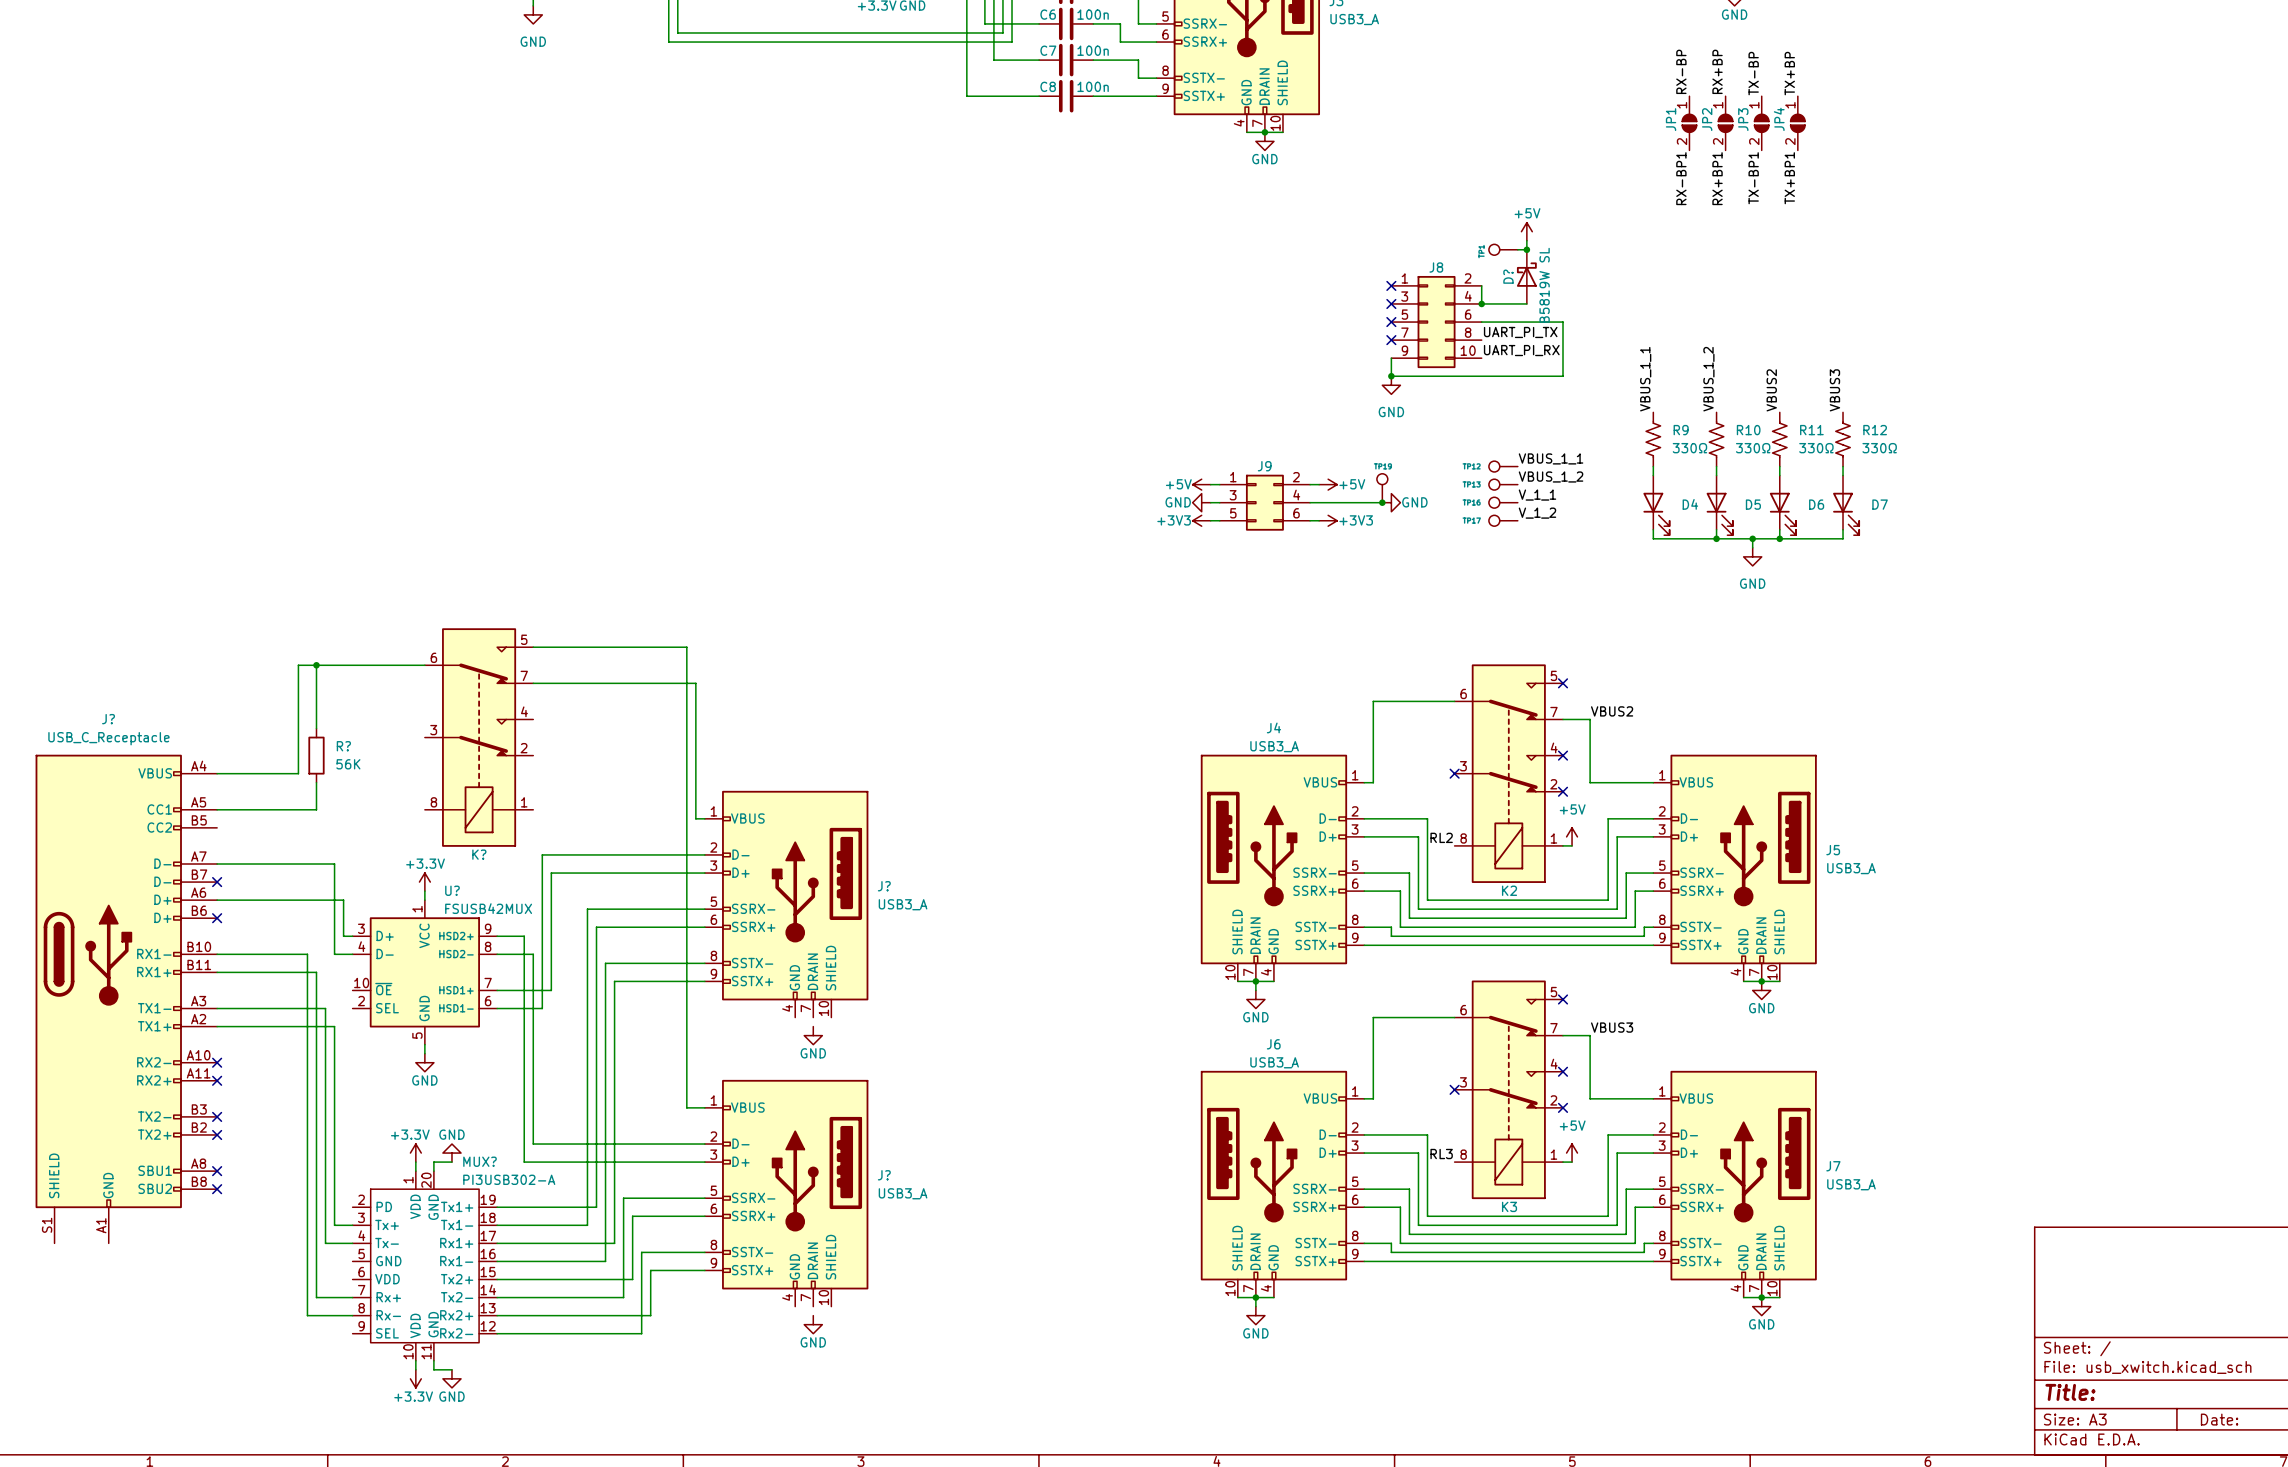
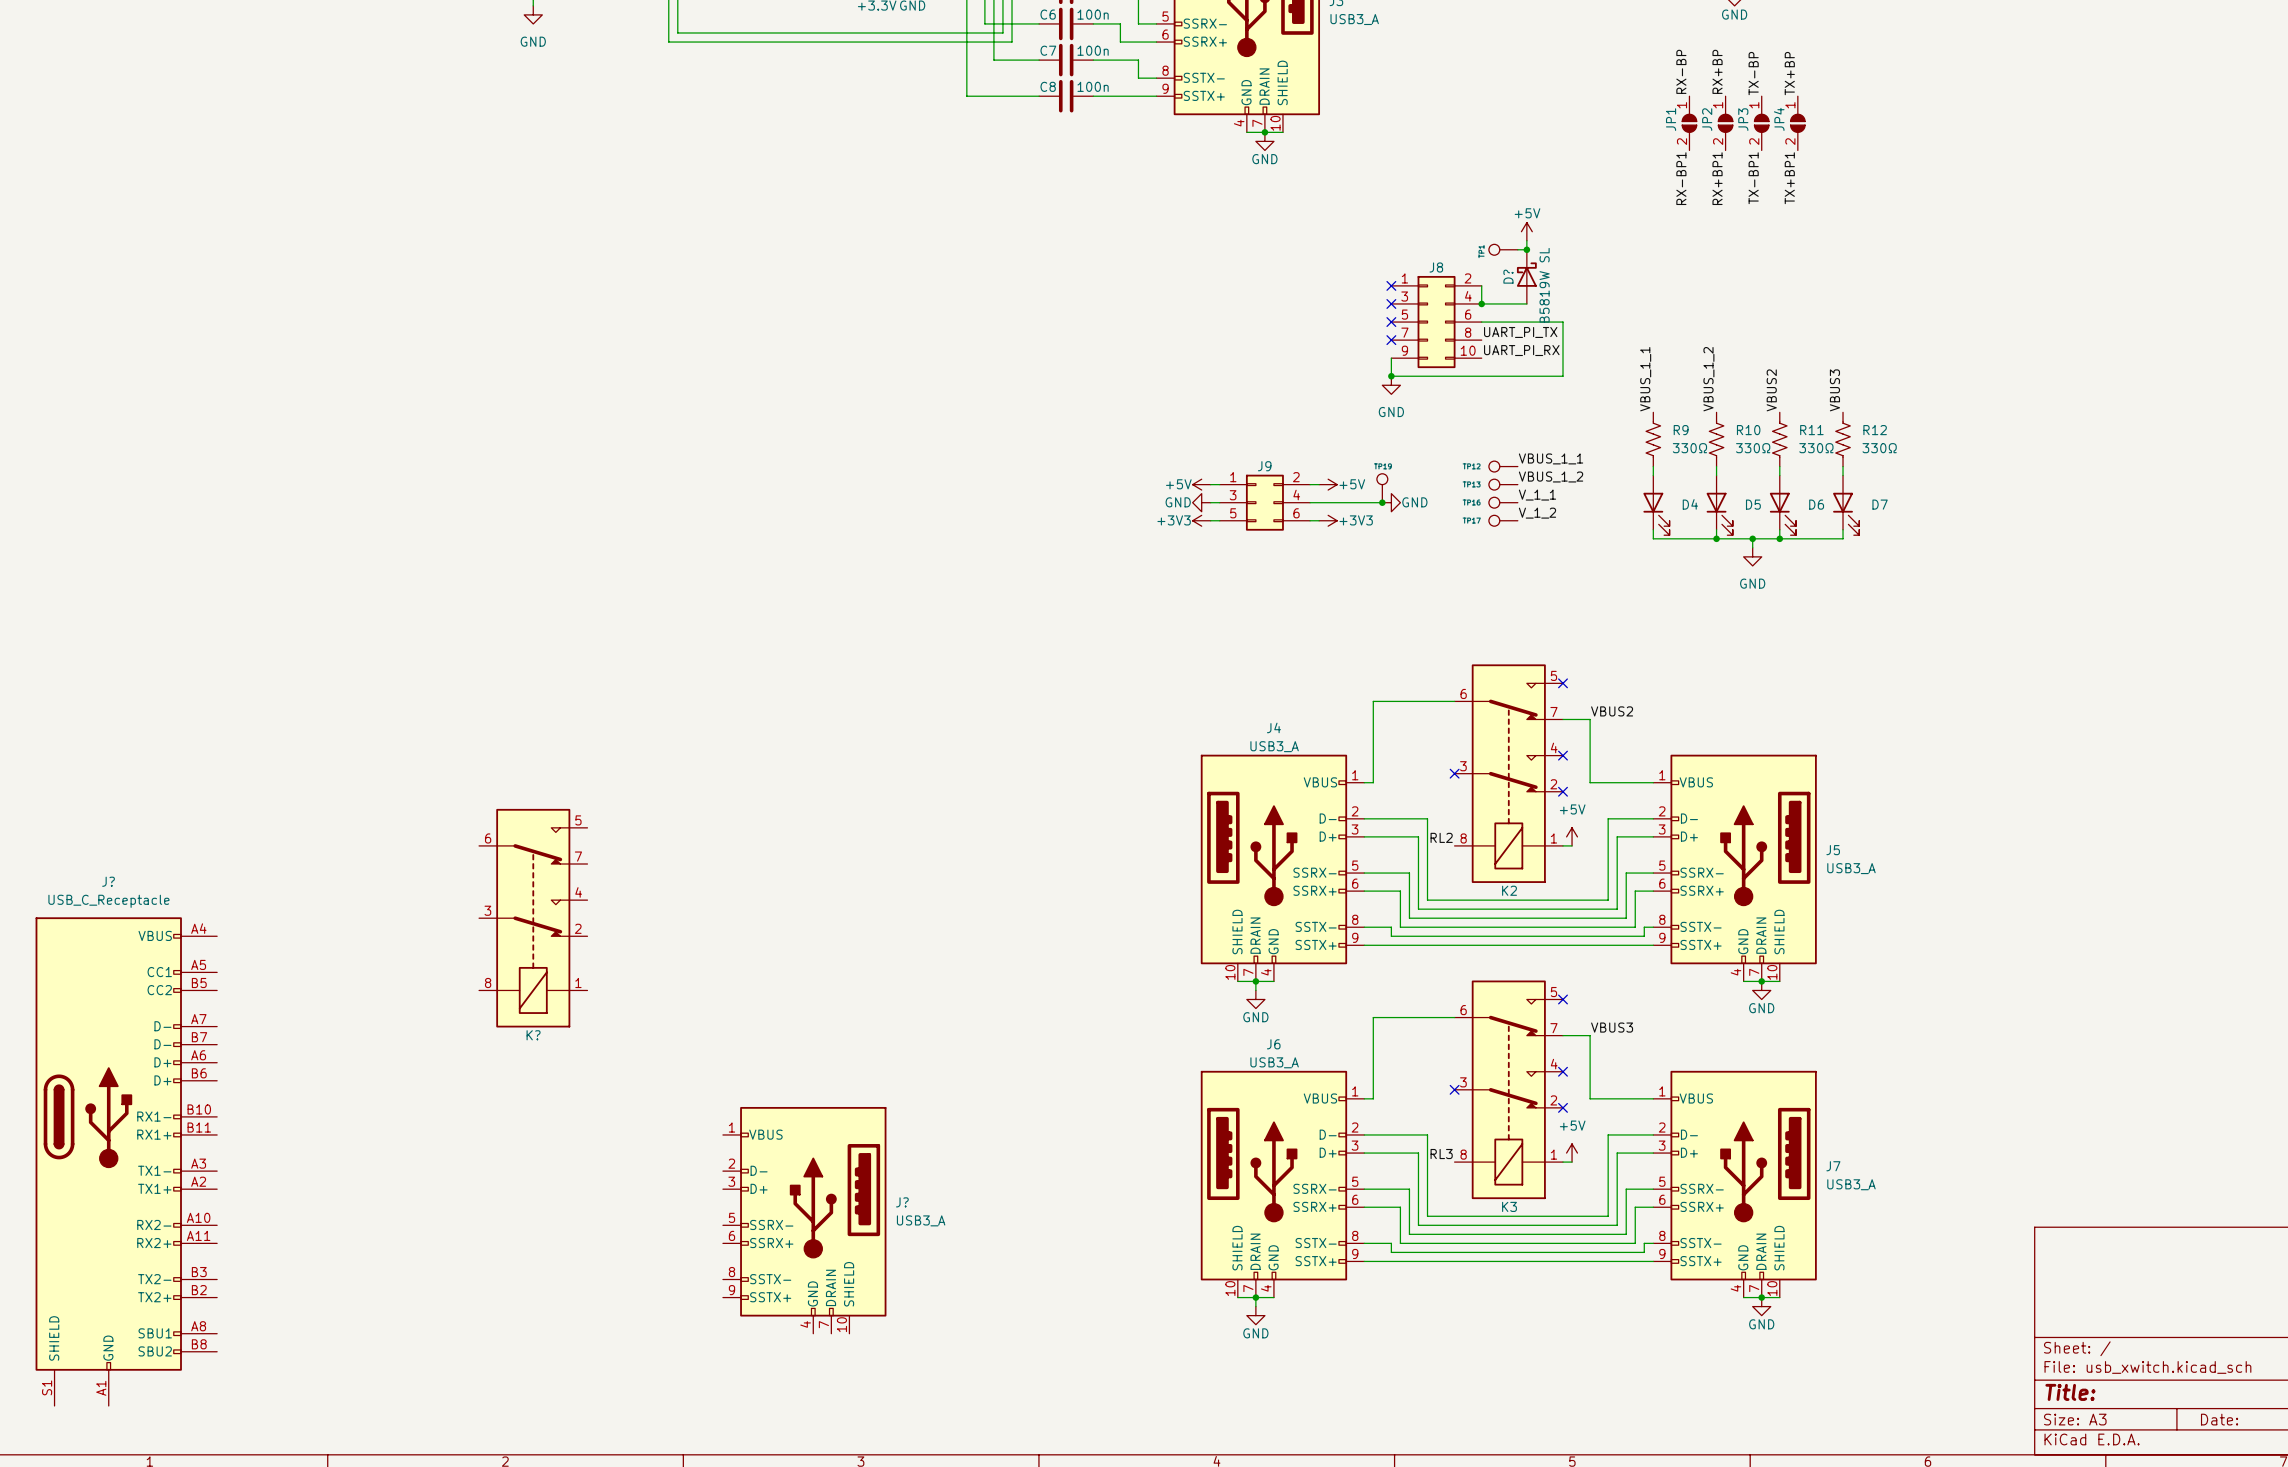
wire: (533, 647) (686, 647) (686, 1107) (704, 1107) -> none
wire: (316, 665) (316, 728) -> none
junction: (316, 665) -> none
wire: (424, 665) (298, 665) (298, 773) (217, 773) -> none
wire: (533, 683) (695, 683) (695, 818) (704, 818) -> none
K?: (479, 737) -> none
R?: 56K (316, 755) -> none
wire: (316, 782) (316, 809) (217, 809) -> none
wire: (704, 854) (542, 854) (542, 1008) (497, 1008) -> none
wire: (217, 864) (334, 864) (334, 954) (352, 954) -> none
wire: (704, 873) (551, 873) (551, 990) (497, 990) -> none
no-connect mark: (217, 882) -> none
power symbol: +3.3V (424, 882) -> none
wire: (424, 891) (424, 900) -> none
wire: (217, 900) (343, 900) (343, 936) (352, 936) -> none
J?: USB3_A (786, 904) -> none
wire: (704, 909) (587, 909) (587, 1225) (497, 1225) -> none
no-connect mark: (217, 918) -> none
K?: none -> (533, 918)
wire: (704, 927) (596, 927) (596, 1207) (497, 1207) -> none
wire: (497, 936) (524, 936) (524, 1162) (704, 1162) -> none
wire: (217, 954) (307, 954) (307, 1315) (352, 1315) -> none
wire: (497, 954) (533, 954) (533, 1144) (704, 1144) -> none
wire: (704, 963) (605, 963) (605, 1261) (497, 1261) -> none
wire: (217, 972) (316, 972) (316, 1297) (352, 1297) -> none
U?: FSUSB42MUX (424, 972) -> none
wire: (704, 981) (614, 981) (614, 1243) (497, 1243) -> none
J? position: (126, 999) -> (126, 1161)
wire: (217, 1008) (325, 1008) (325, 1243) (352, 1243) -> none
wire: (217, 1026) (334, 1026) (334, 1225) (352, 1225) -> none
power symbol: GND (813, 1035) -> none
wire: (424, 1044) (424, 1053) -> none
no-connect mark: (217, 1062) -> none
power symbol: GND (424, 1062) -> none
no-connect mark: (217, 1080) -> none
no-connect mark: (217, 1116) -> none
no-connect mark: (217, 1134) -> none
power symbol: +3.3V (415, 1153) -> none
power symbol: GND (451, 1153) -> none
wire: (415, 1162) (415, 1171) -> none
wire: (451, 1162) (433, 1162) (433, 1171) -> none
no-connect mark: (217, 1171) -> none
no-connect mark: (217, 1189) -> none
J? position: (786, 1193) -> (804, 1220)
wire: (704, 1198) (623, 1198) (623, 1297) (497, 1297) -> none
wire: (704, 1216) (632, 1216) (632, 1279) (497, 1279) -> none
wire: (704, 1252) (641, 1252) (641, 1333) (497, 1333) -> none
MUX?: PI3USB302-A (424, 1265) -> none
wire: (704, 1270) (650, 1270) (650, 1315) (497, 1315) -> none
power symbol: GND (813, 1324) -> none
wire: (415, 1360) (415, 1369) -> none
wire: (433, 1360) (433, 1369) (451, 1369) -> none
power symbol: +3.3V (415, 1378) -> none
power symbol: GND (451, 1378) -> none

